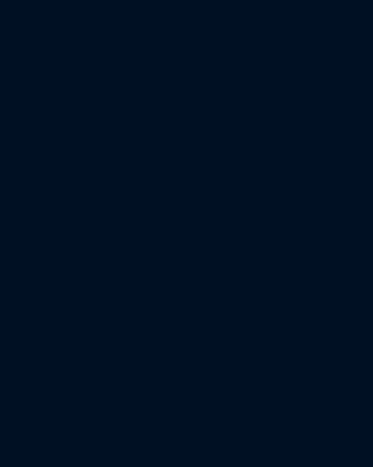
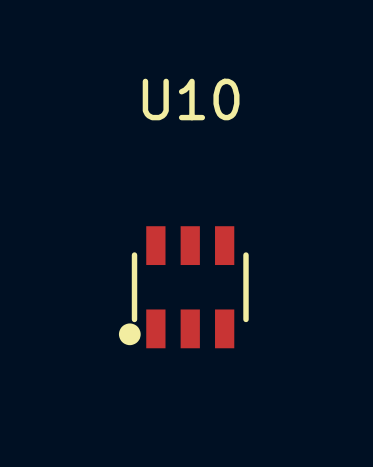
U10: none -> (183, 287)

